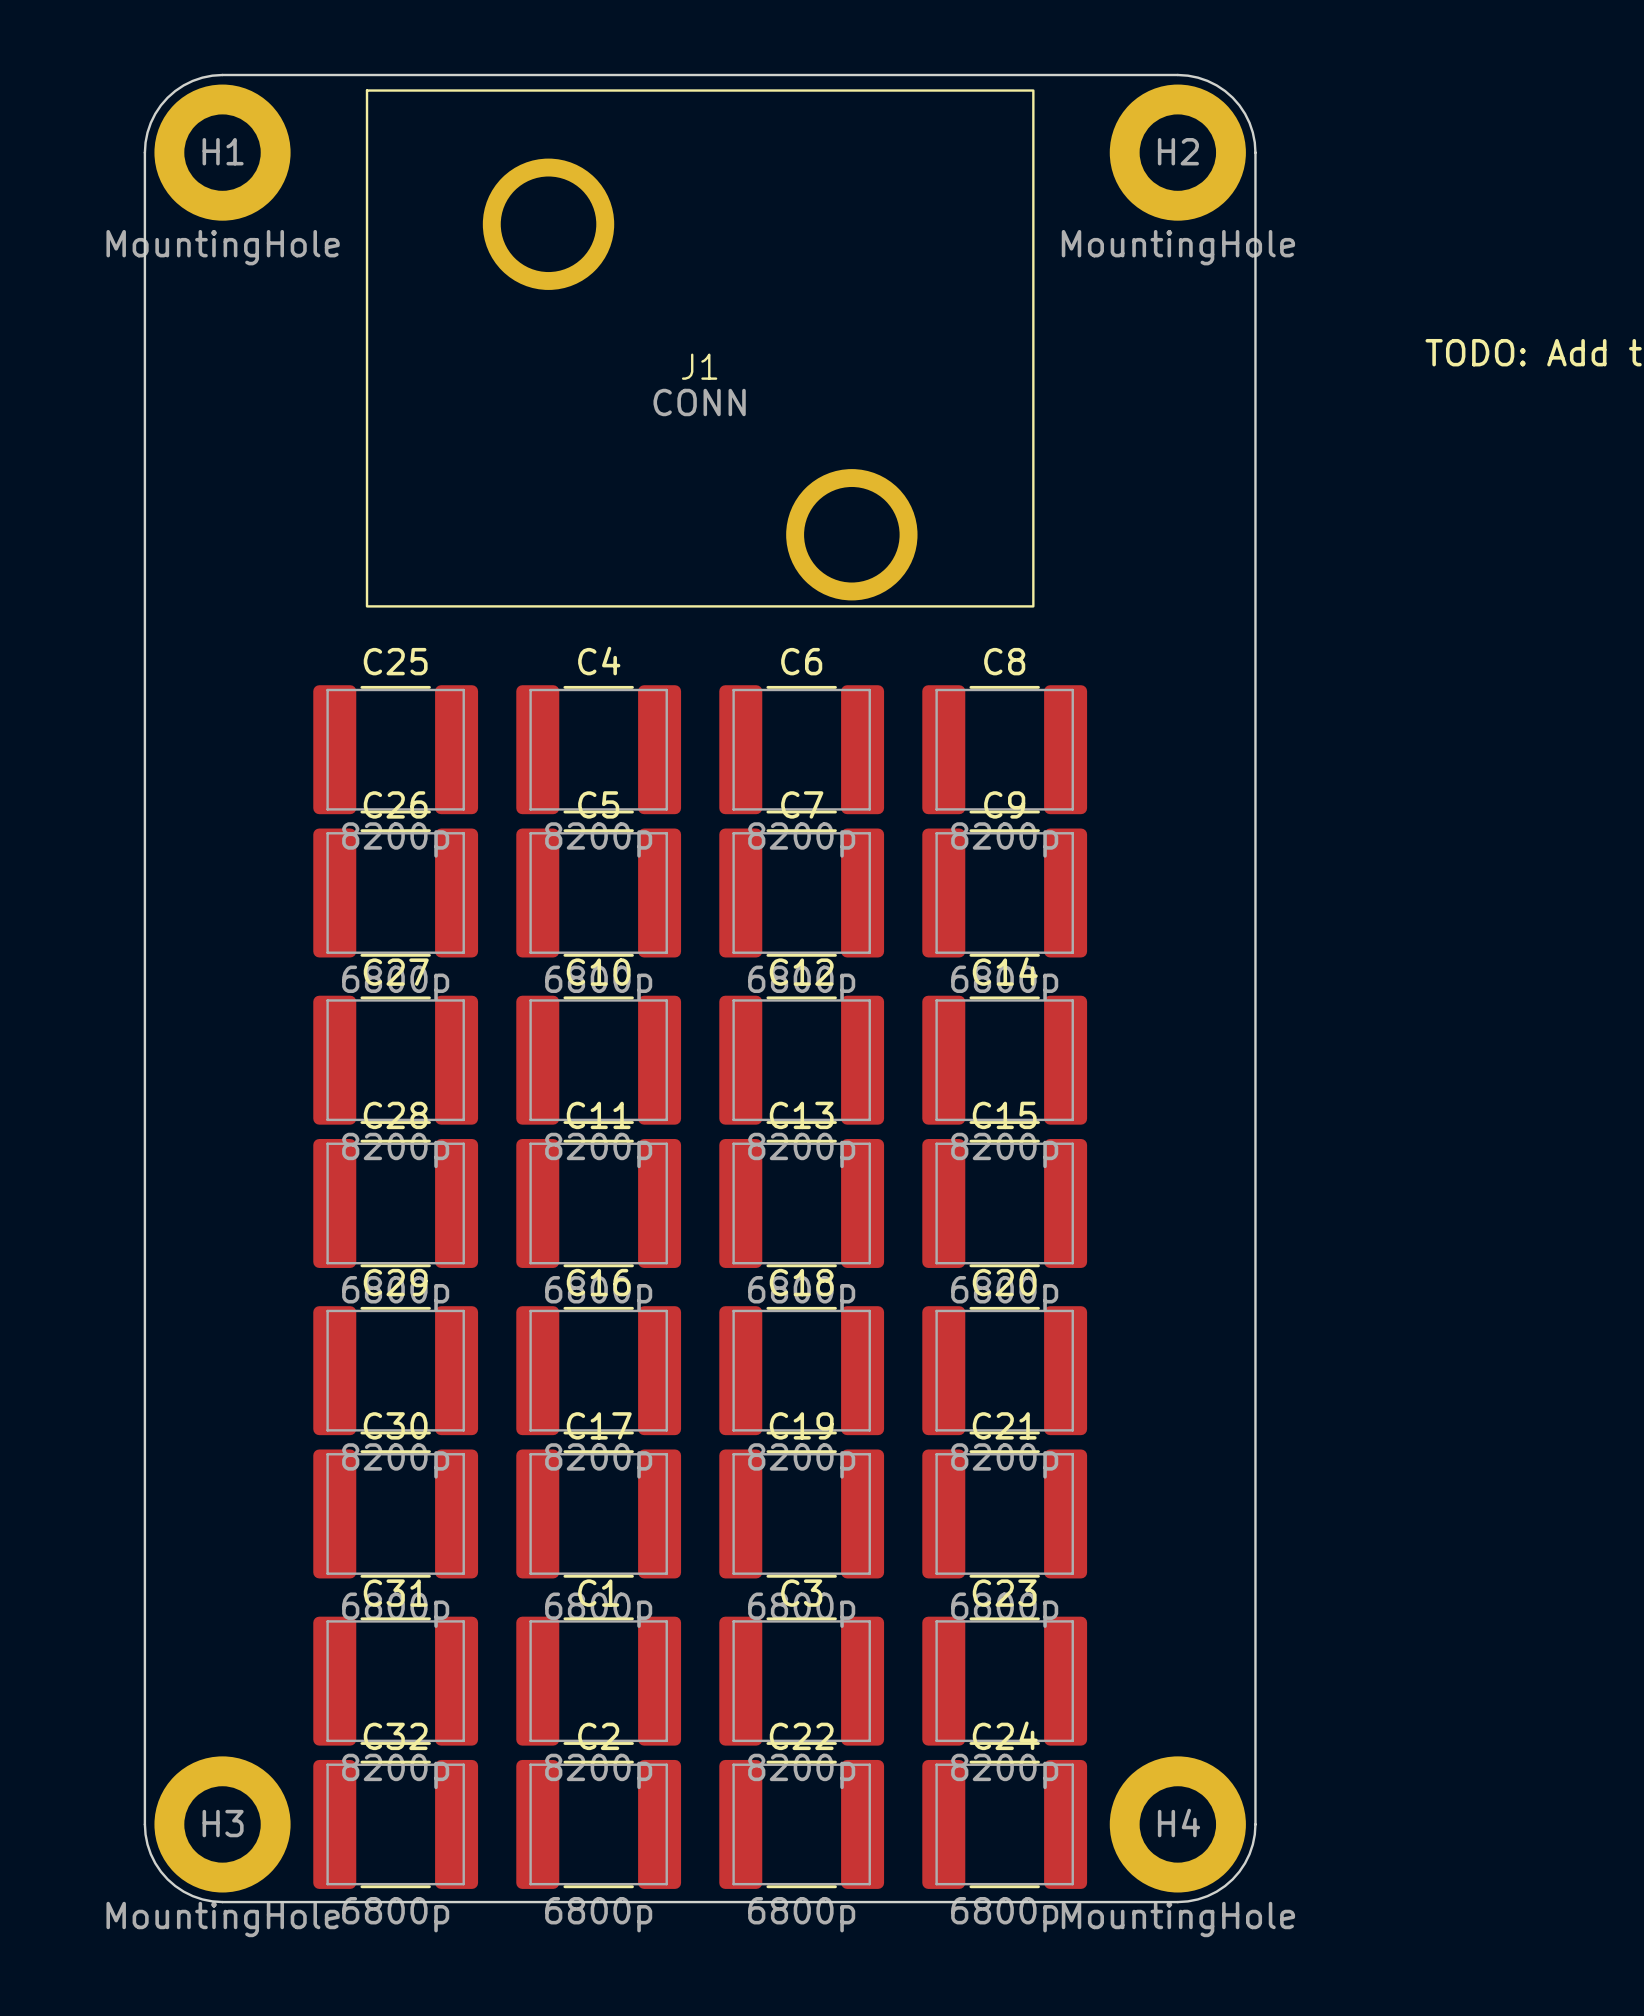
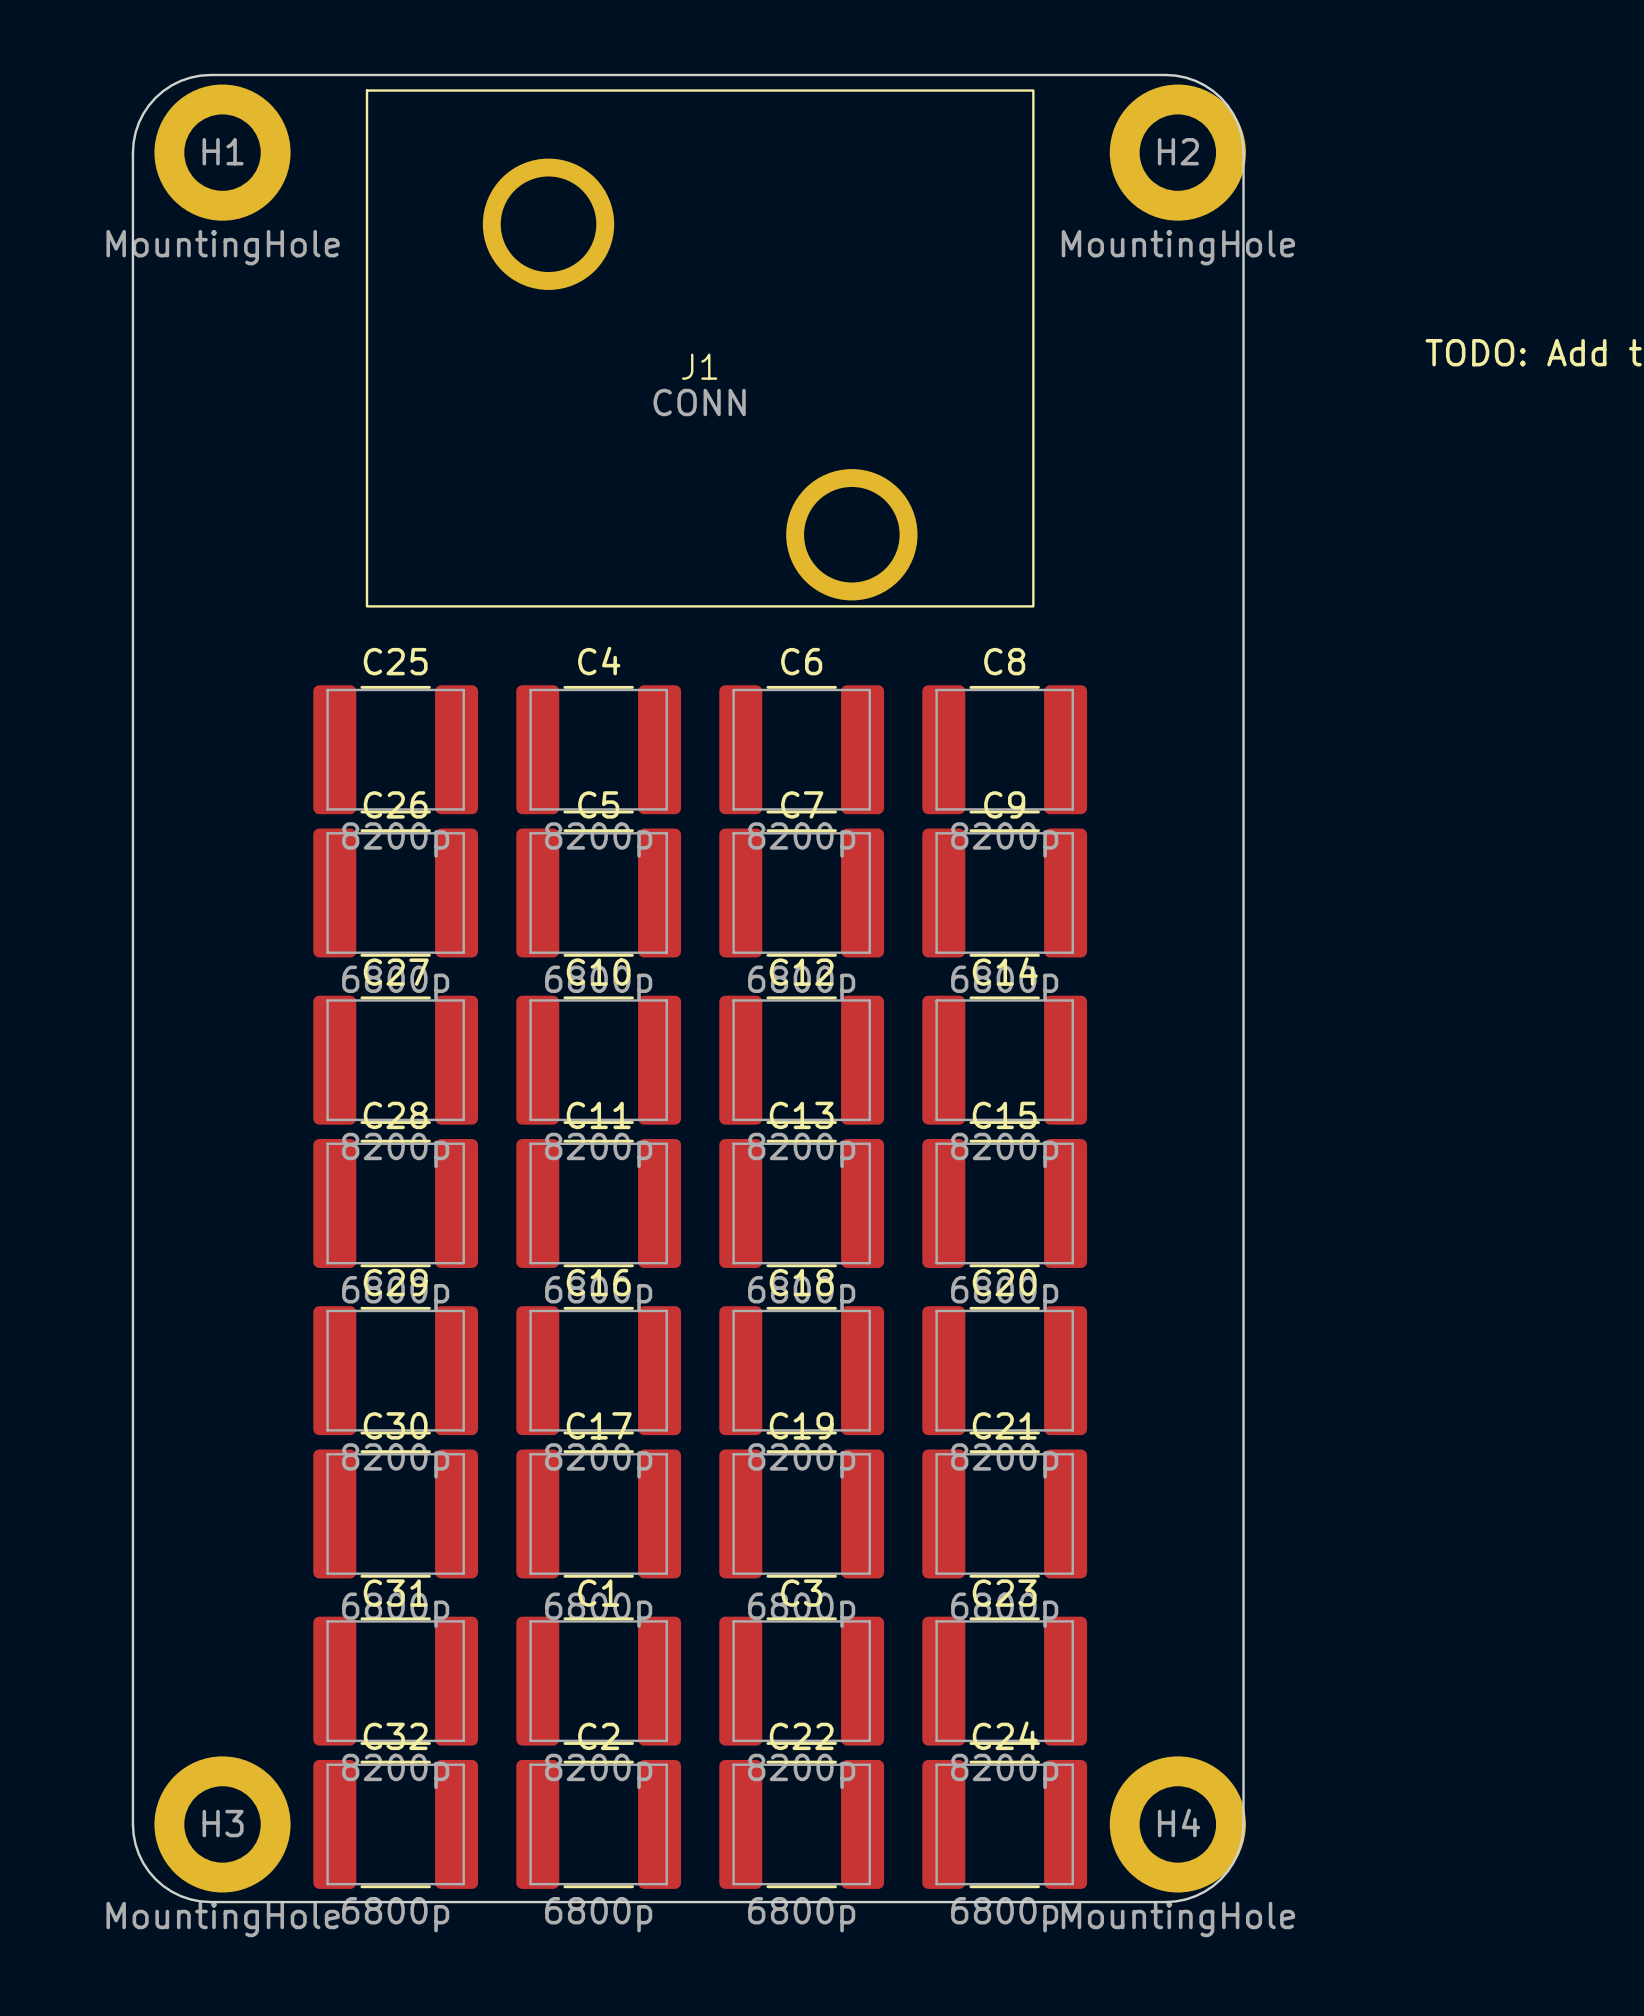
board edge: (222, 75) (192, 80) (167, 97) (150, 122) (144, 152) (144, 1824) (150, 1854) (167, 1879) (192, 1896) (222, 1902) -> (222, 75) (190, 77) (163, 91) (143, 113) (135, 132) (132, 152) (132, 1824) (135, 1844) (143, 1863) (163, 1886) (190, 1899) (222, 1902)
board edge: (1165, 75) (1197, 77) (1225, 91) (1245, 113) (1252, 132) (1255, 152) (1255, 1824) (1252, 1844) (1245, 1863) (1225, 1886) (1197, 1899) (1165, 1902) -> (1165, 75) (1195, 80) (1220, 97) (1237, 122) (1243, 152) (1243, 1824) (1237, 1854) (1220, 1879) (1195, 1896) (1165, 1902)

